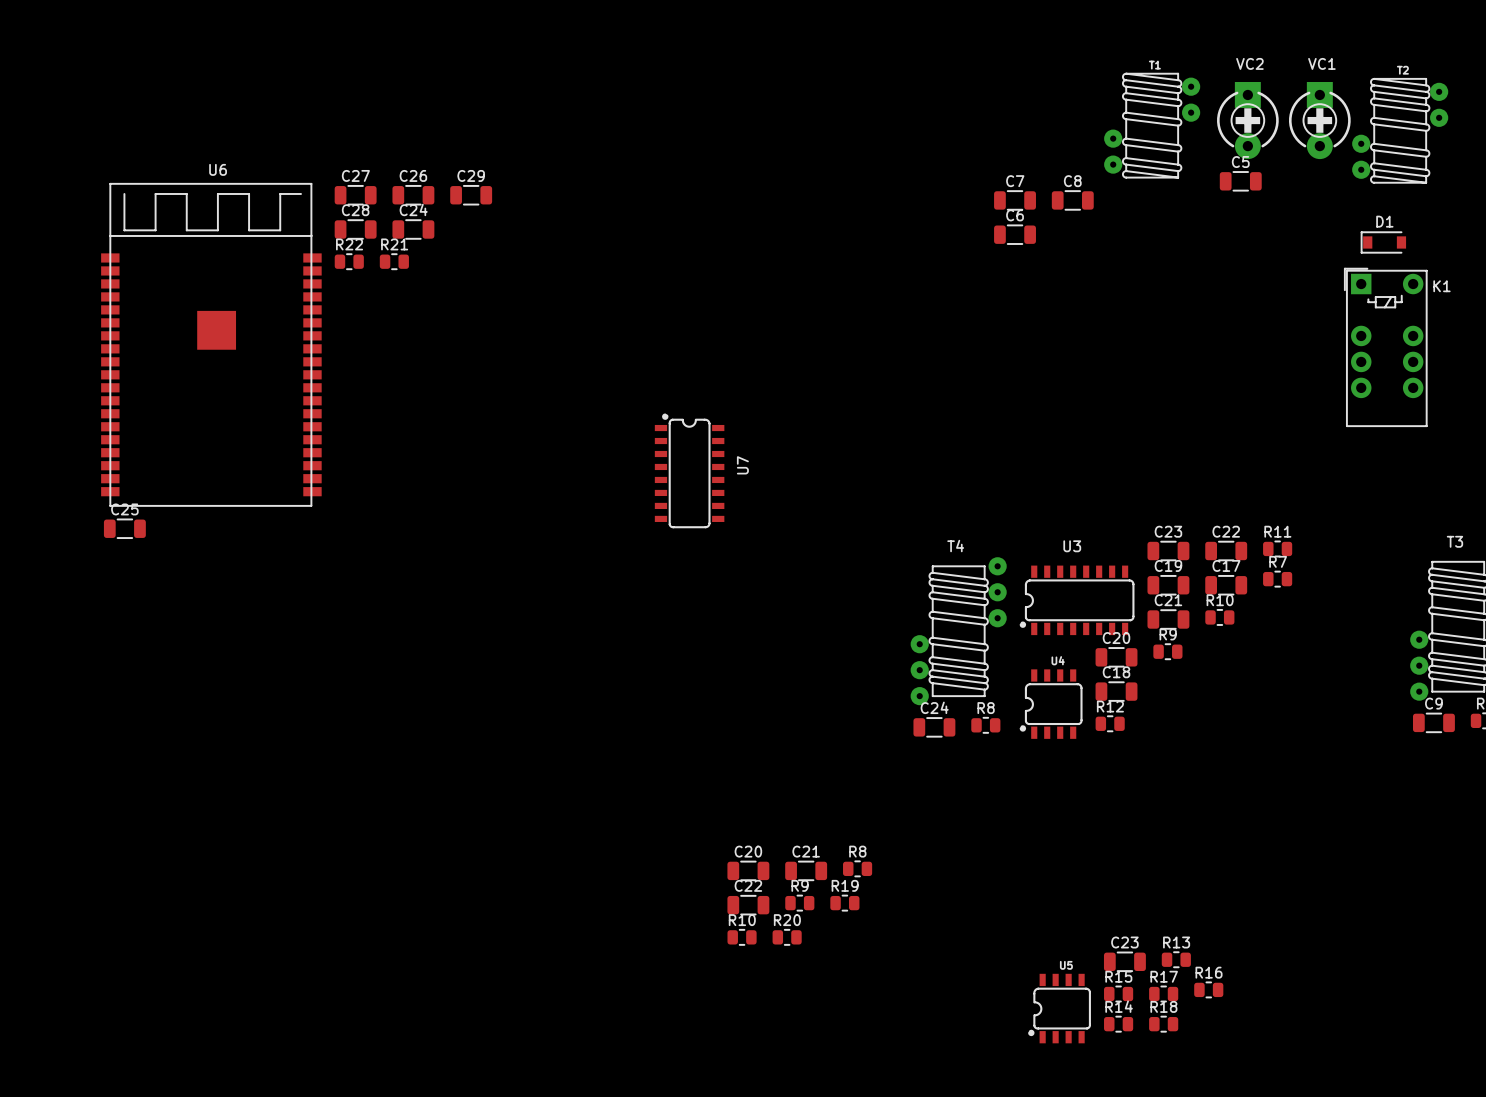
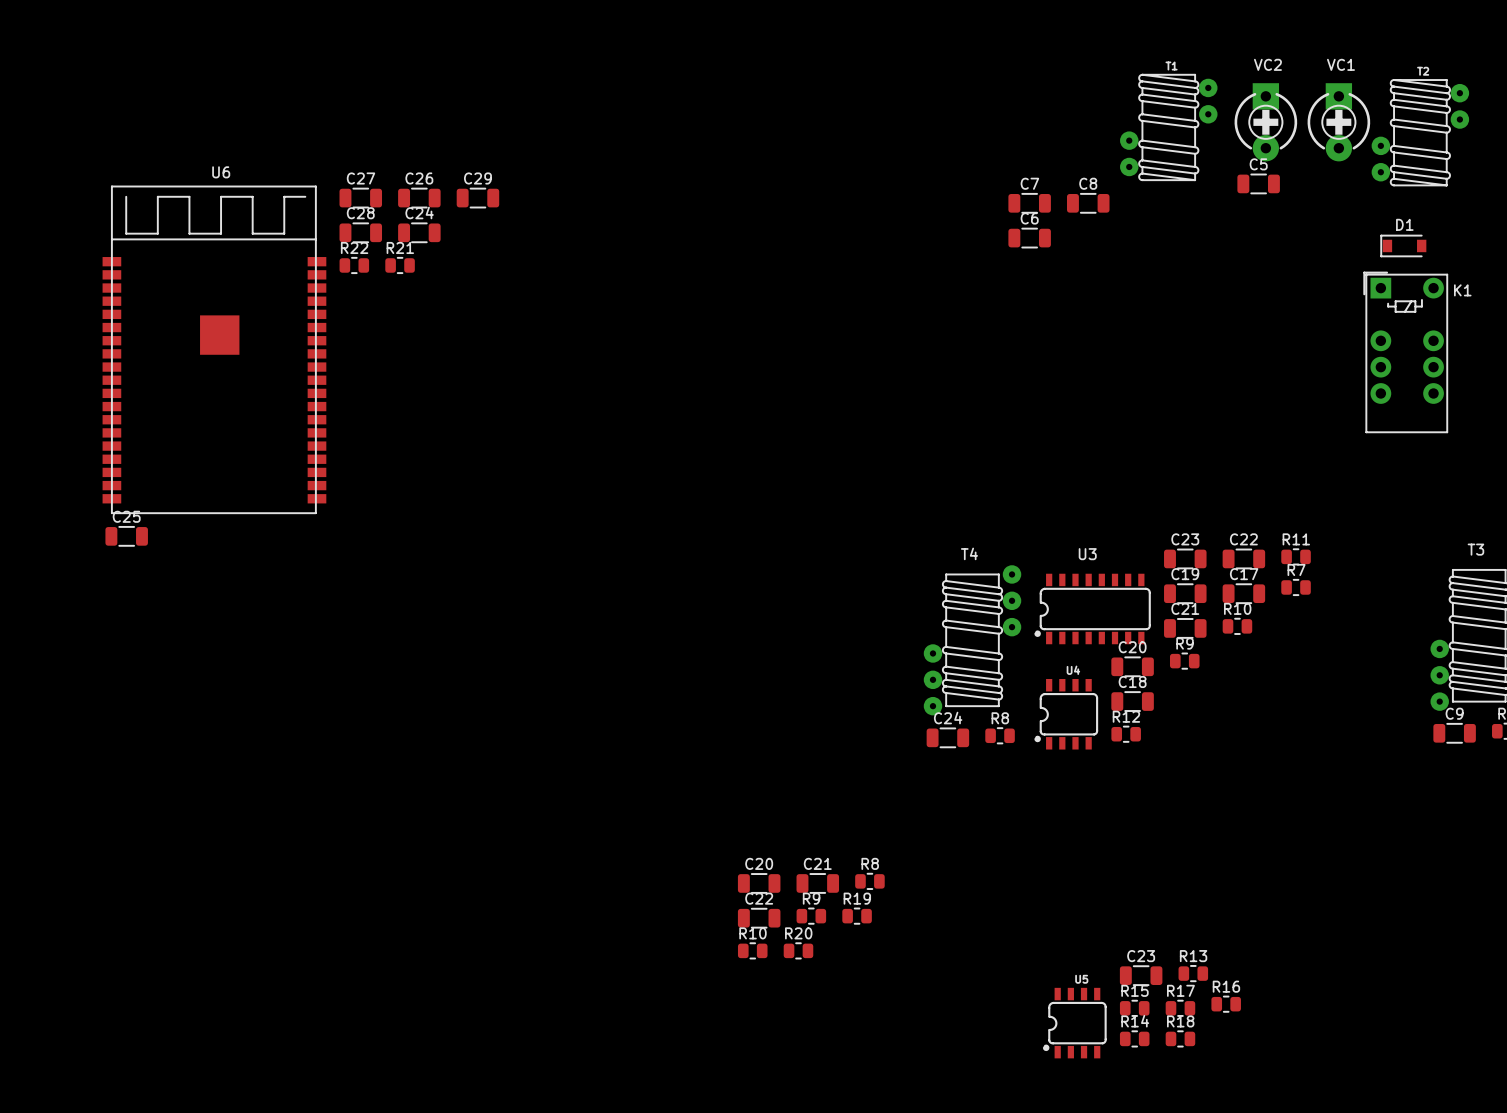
U7: (689, 470) -> none

